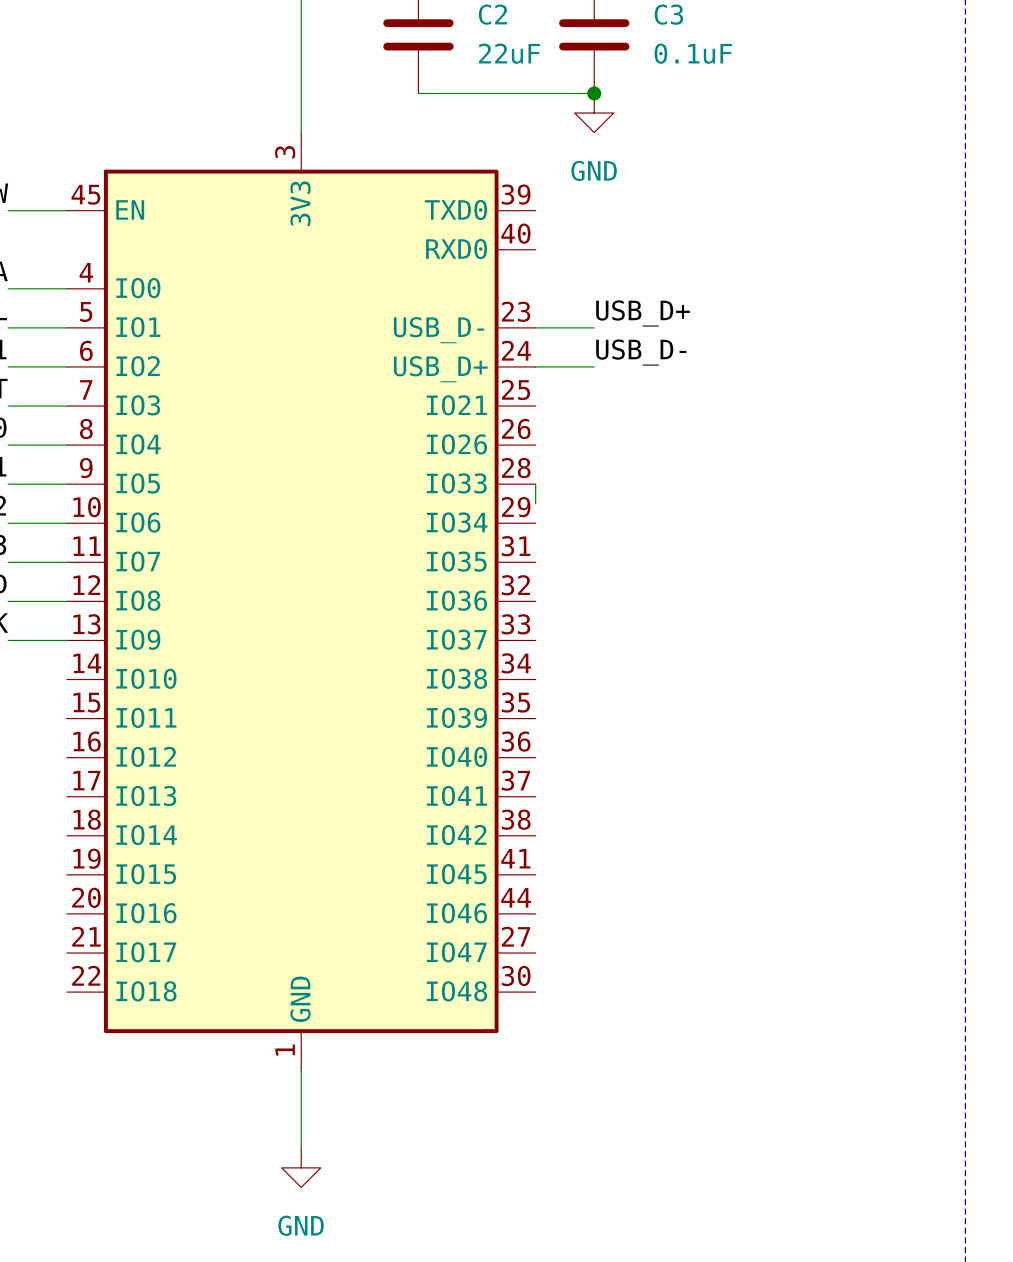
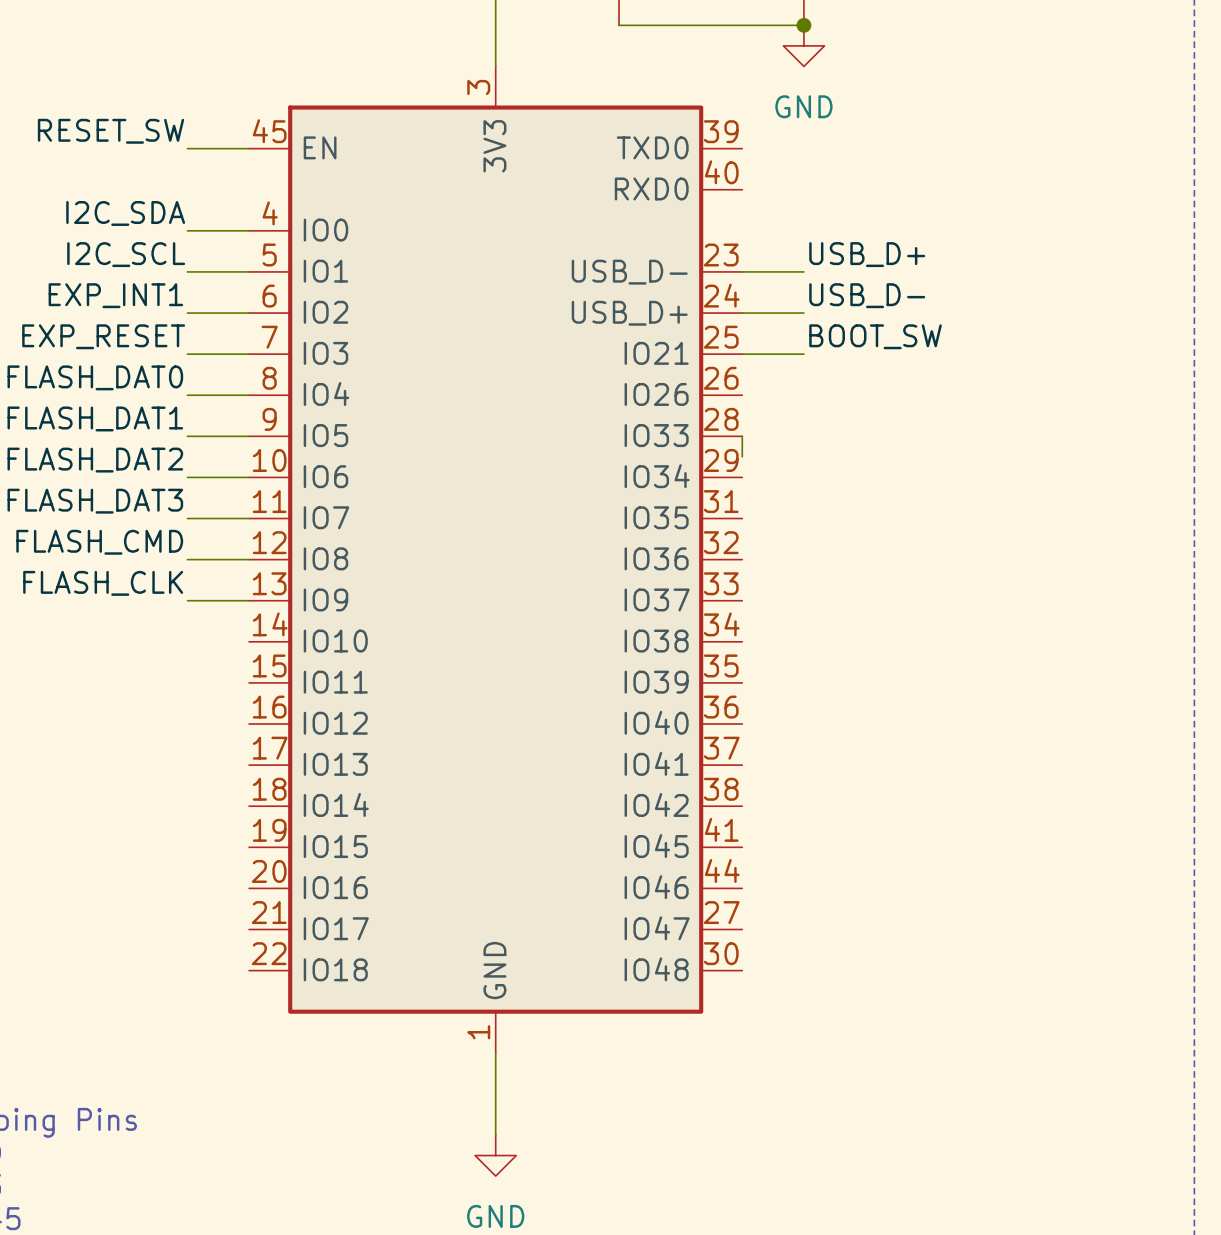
label: none -> BOOT_SW (875, 336)
wire: none -> (742, 354) (803, 354)

